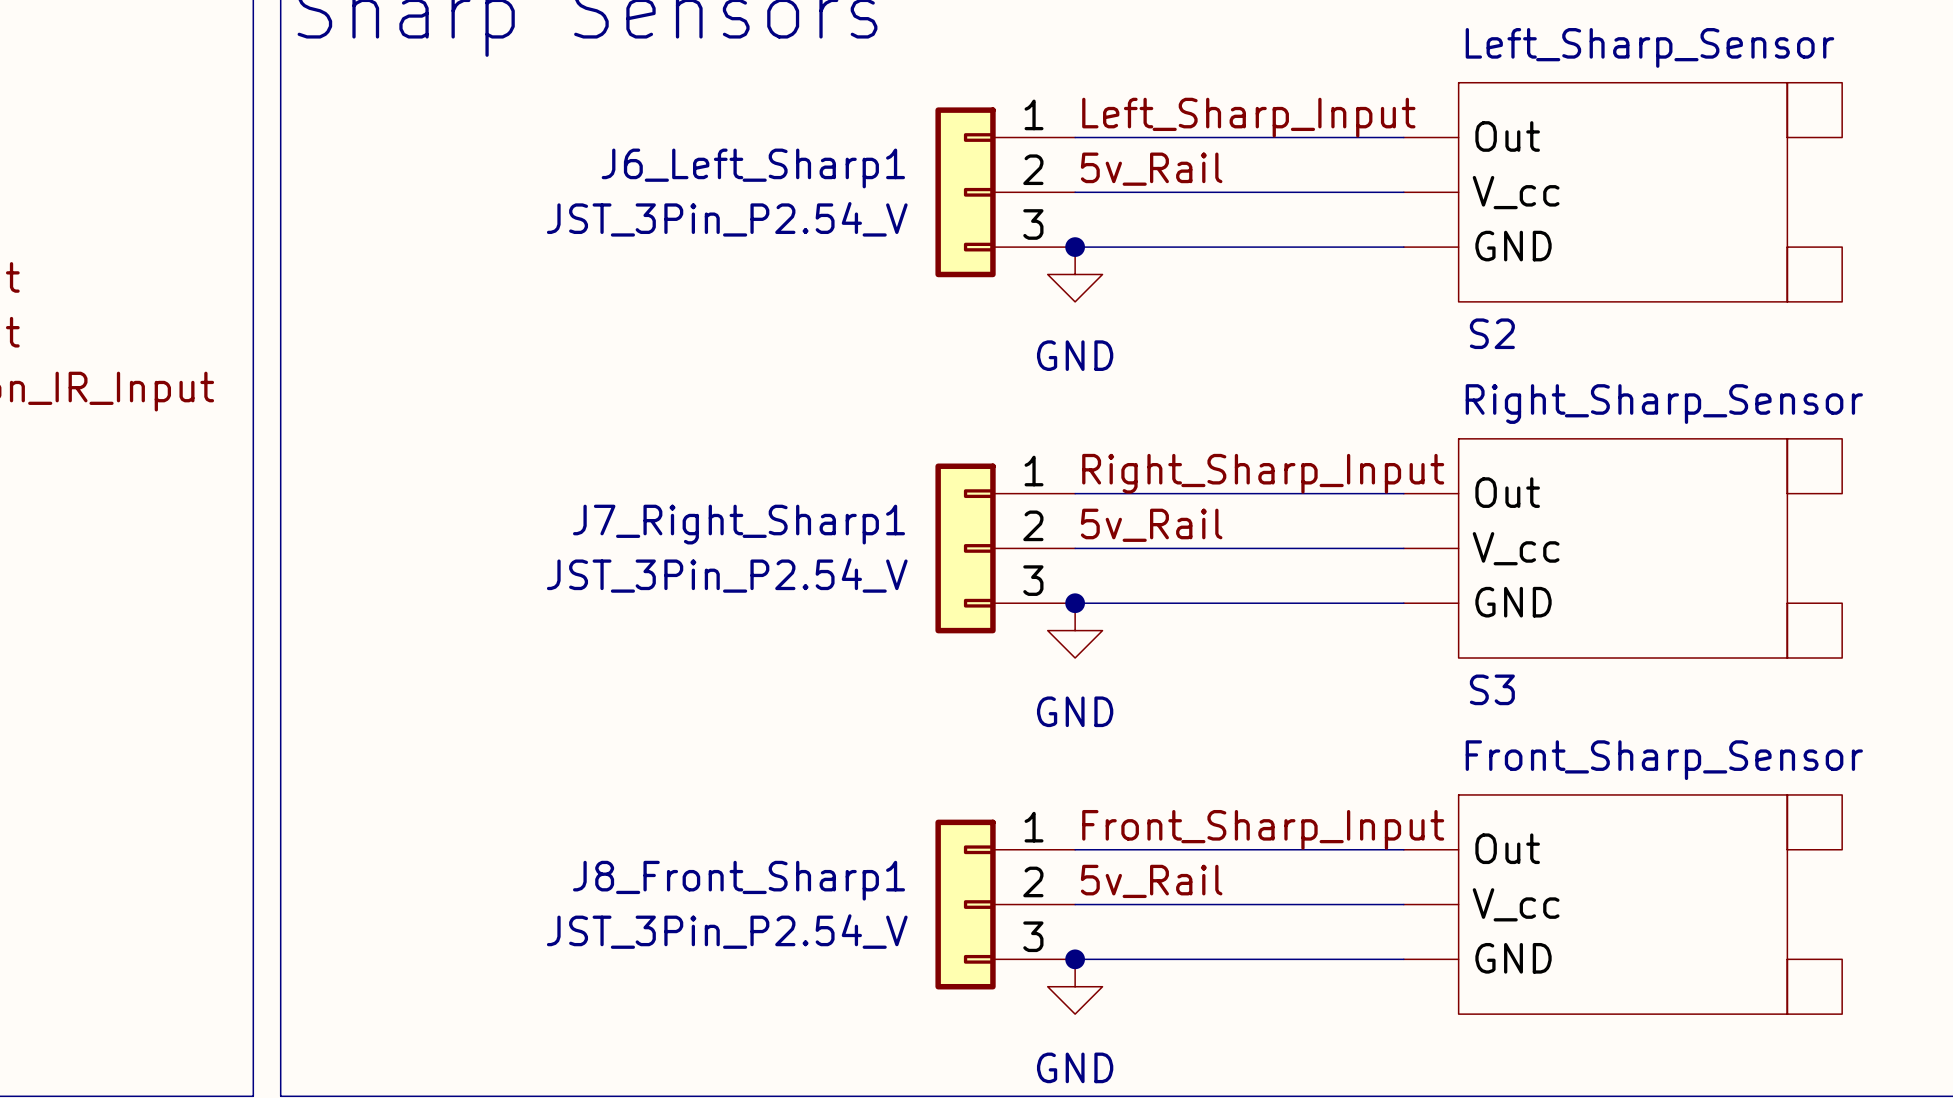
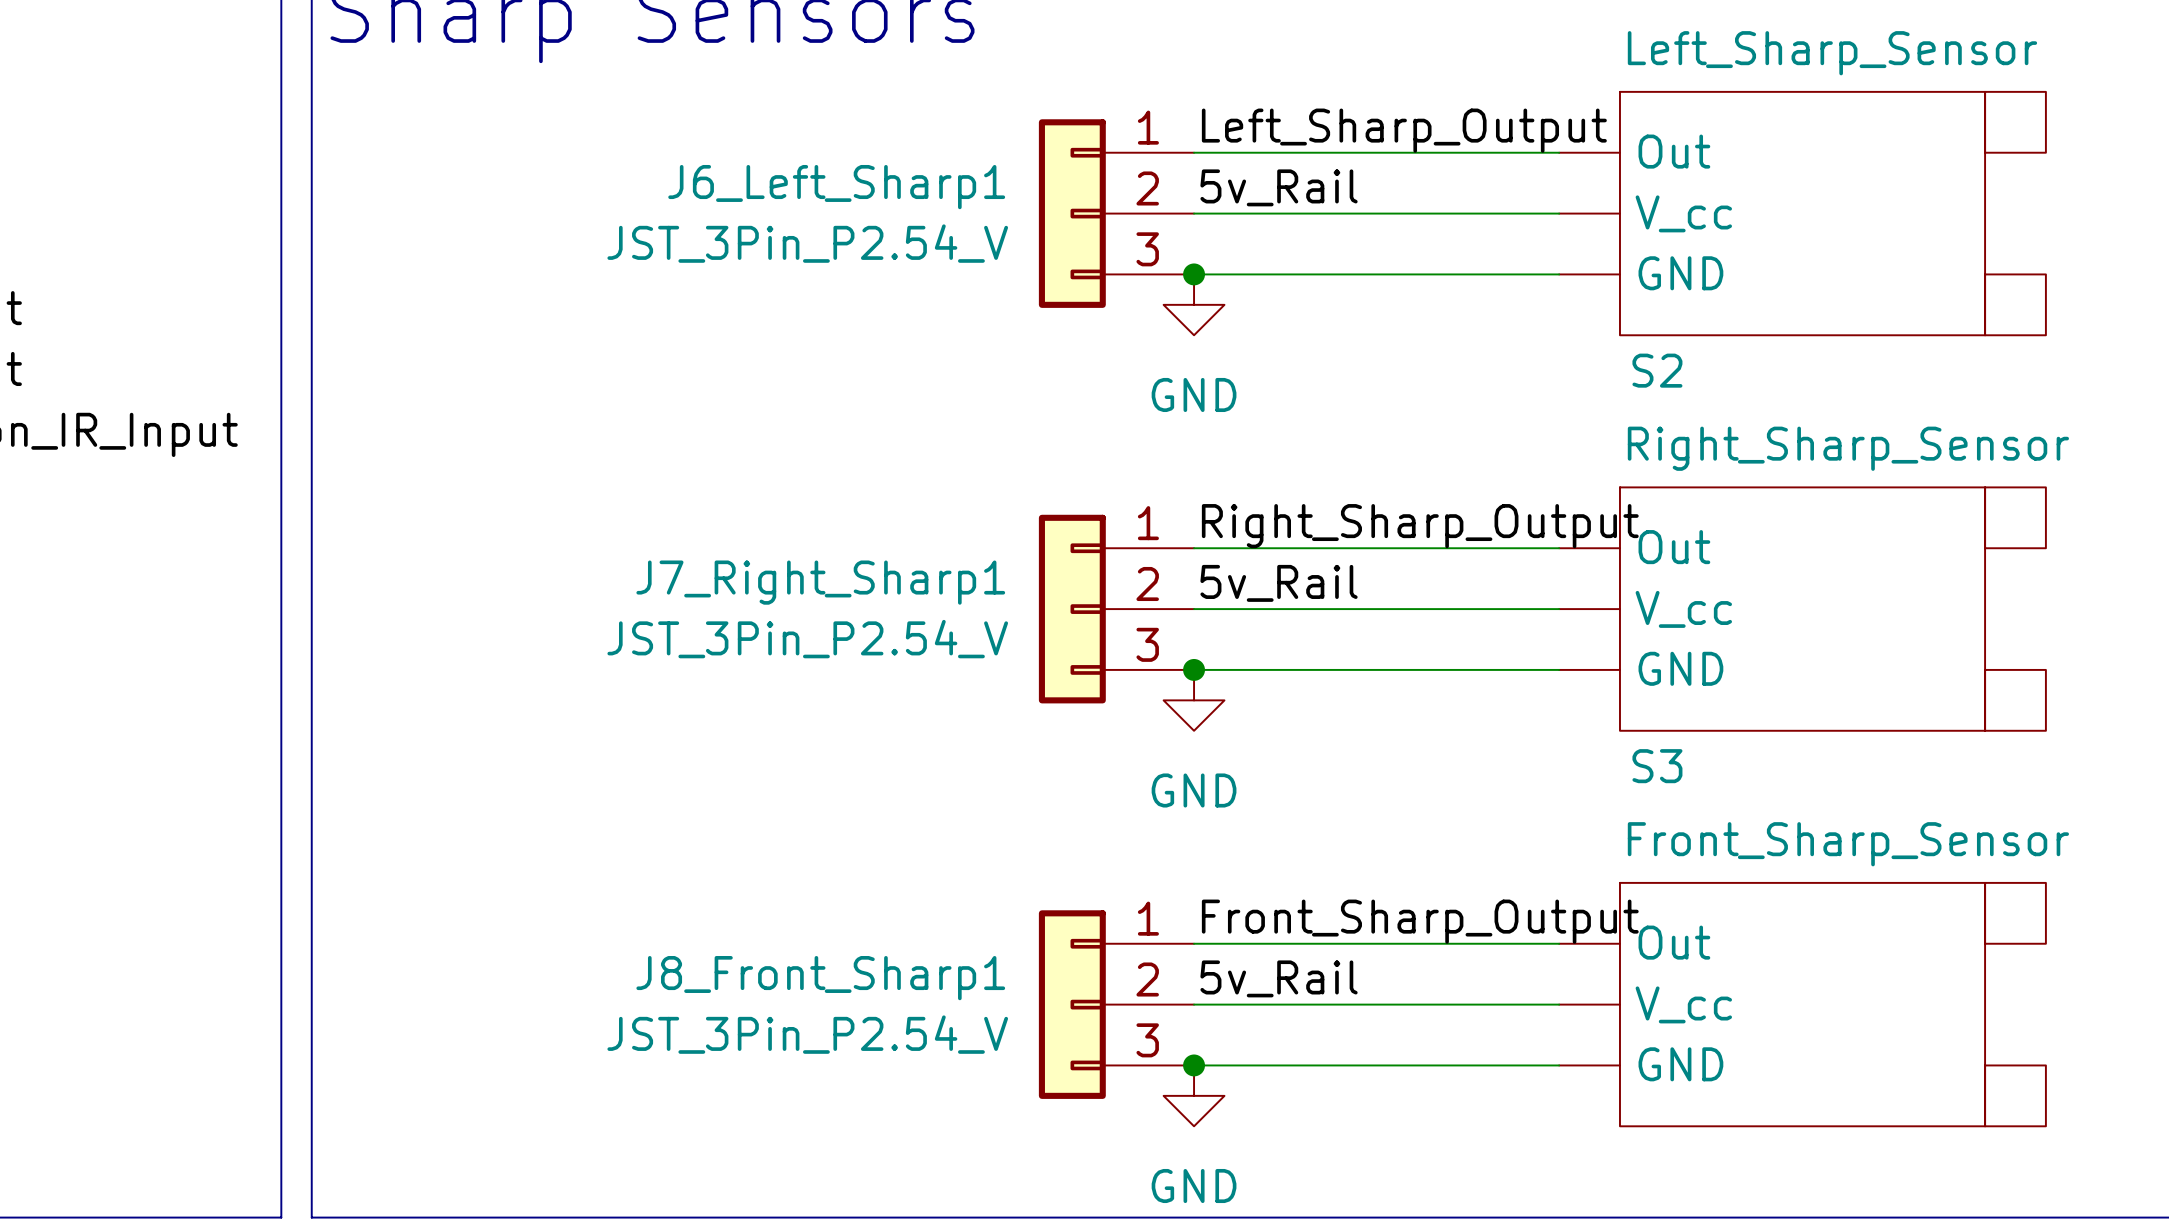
label: Left_Sharp_Input (1248, 117) -> Left_Sharp_Output (1404, 130)
label: Right_Sharp_Input (1263, 473) -> Right_Sharp_Output (1420, 526)
label: Front_Sharp_Input (1263, 829) -> Front_Sharp_Output (1420, 921)

